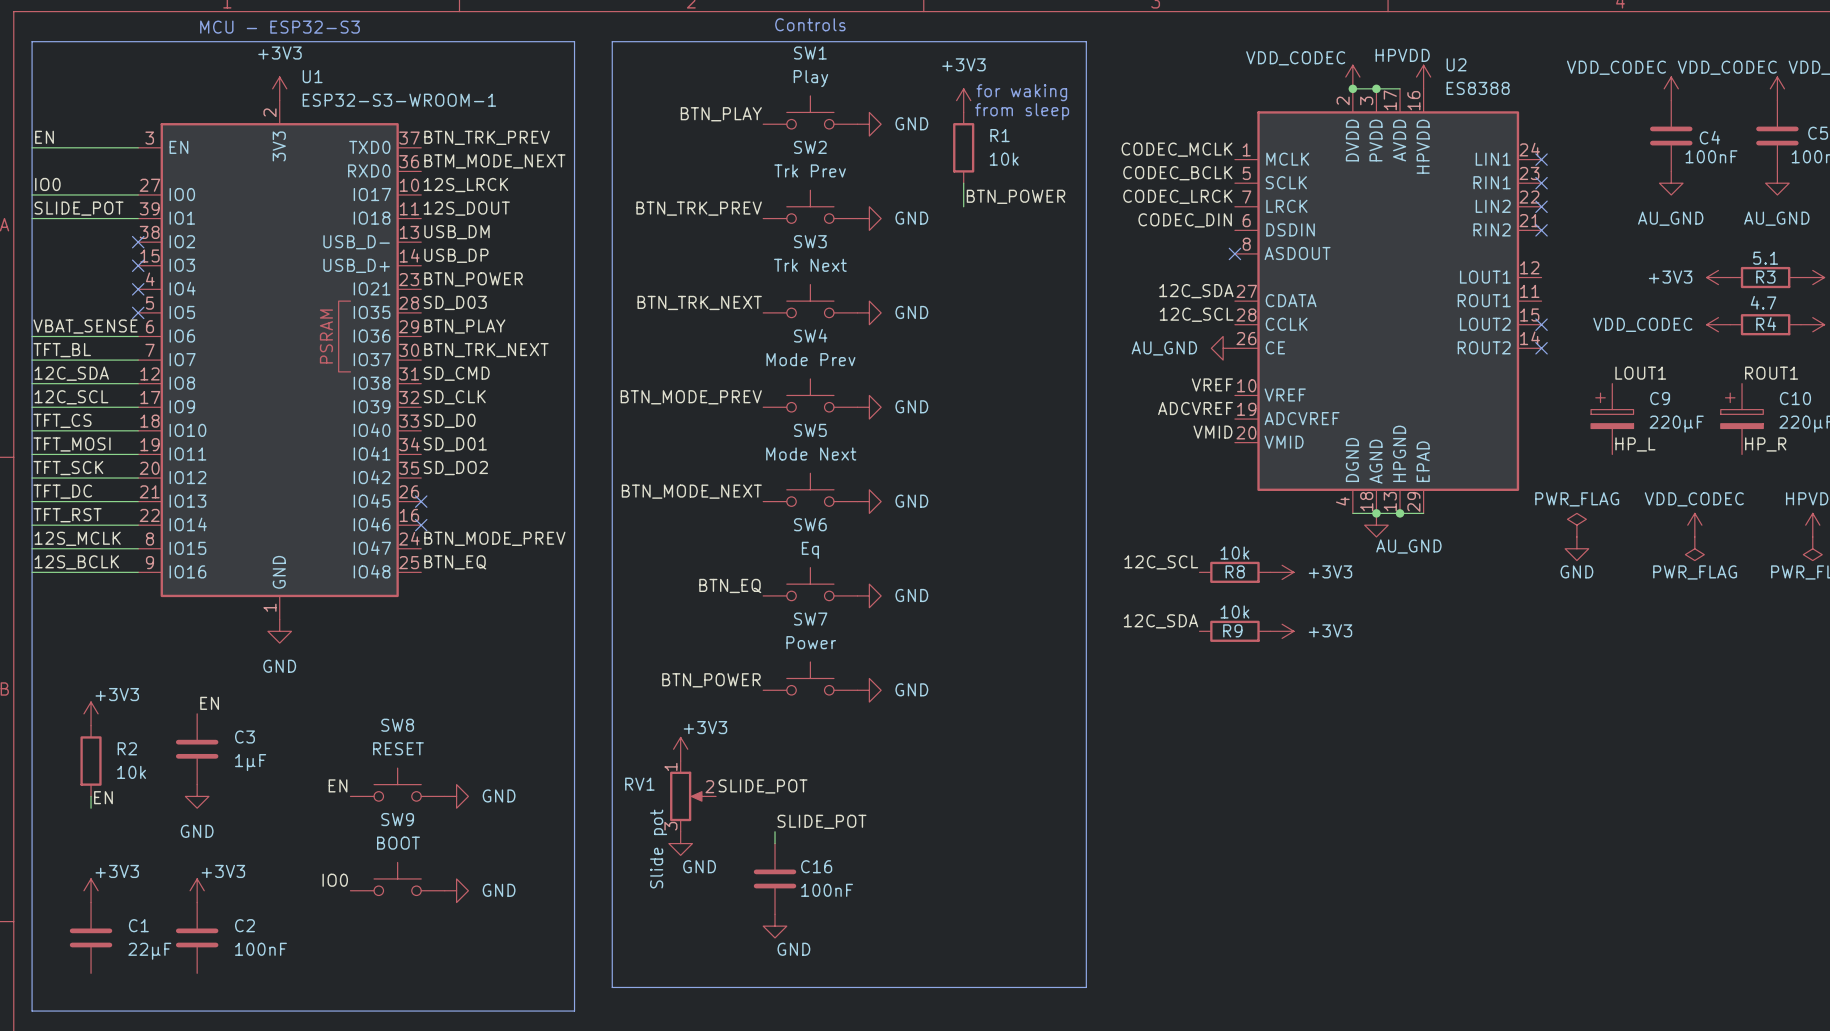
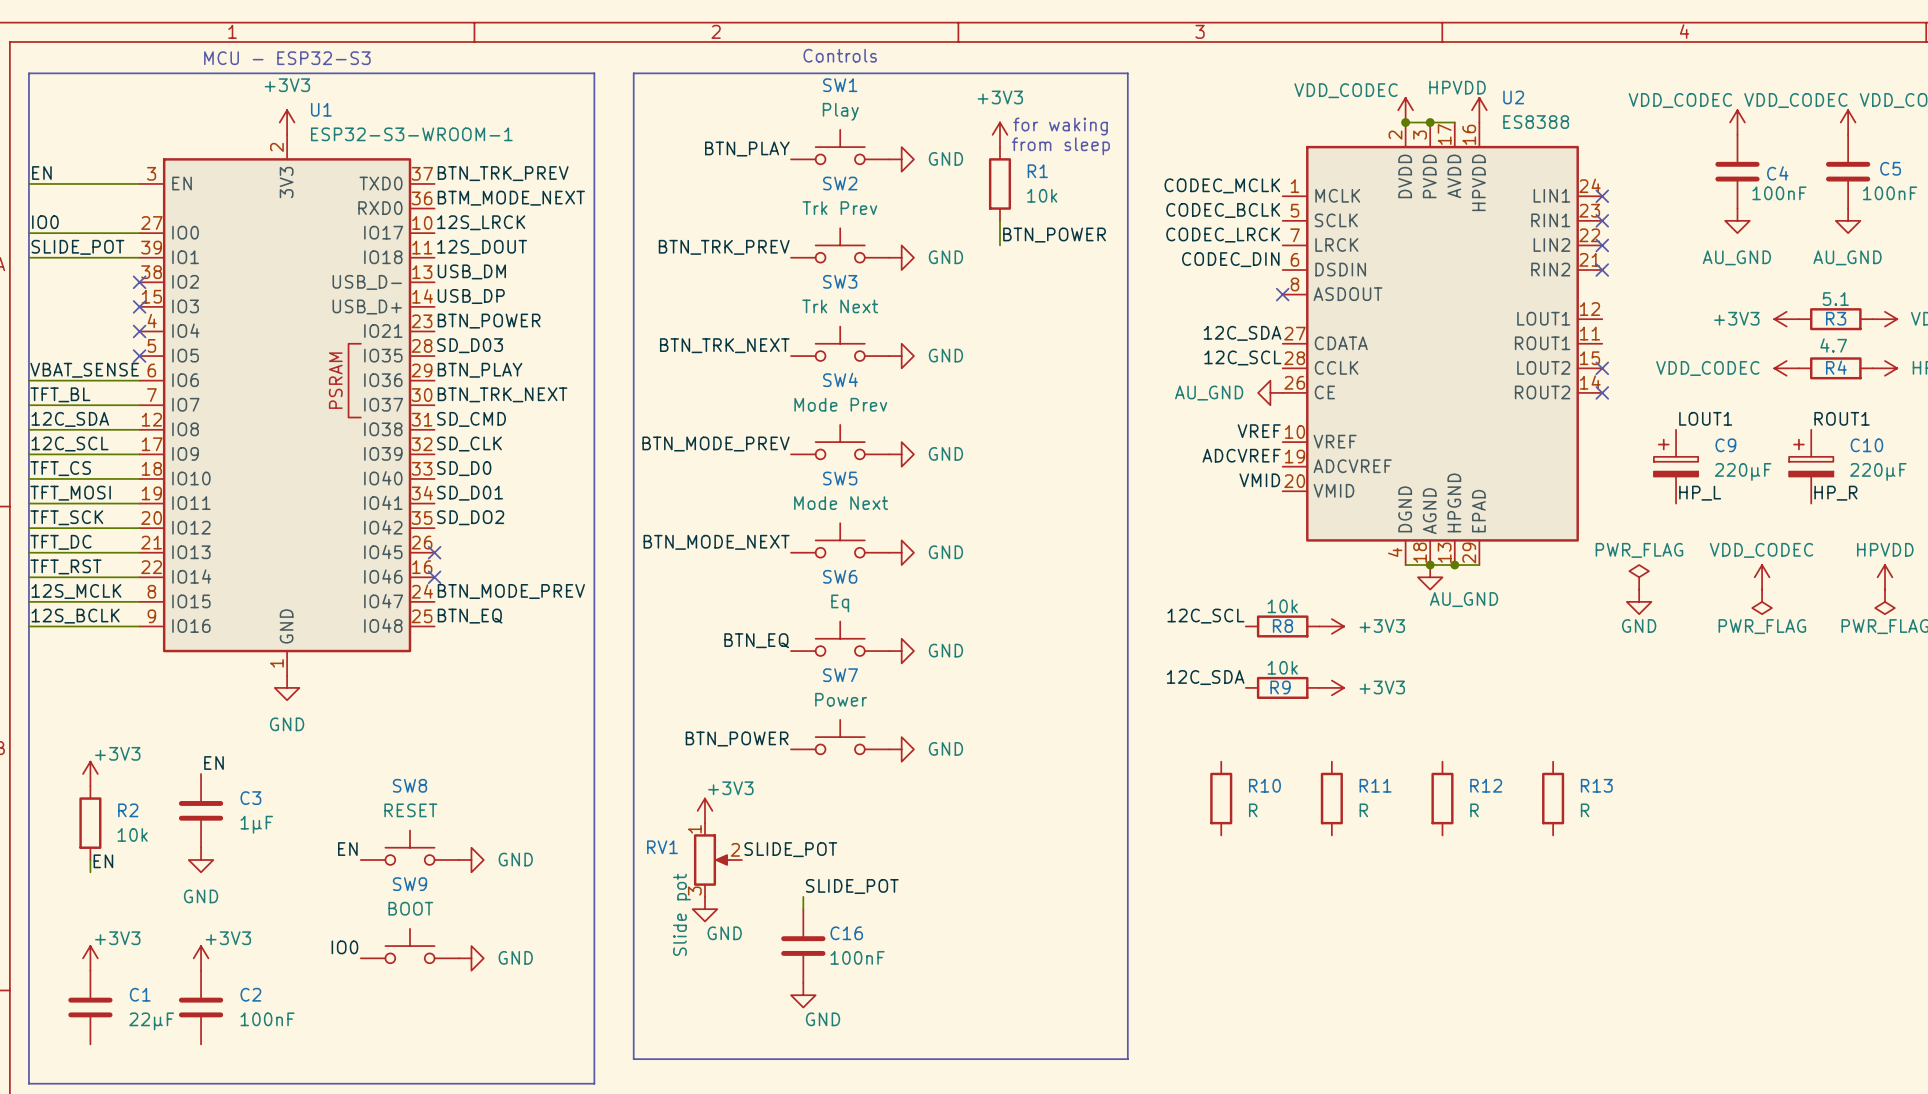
R10: none -> R (1221, 798)
R11: none -> R (1331, 798)
R12: none -> R (1442, 798)
R13: none -> R (1553, 798)

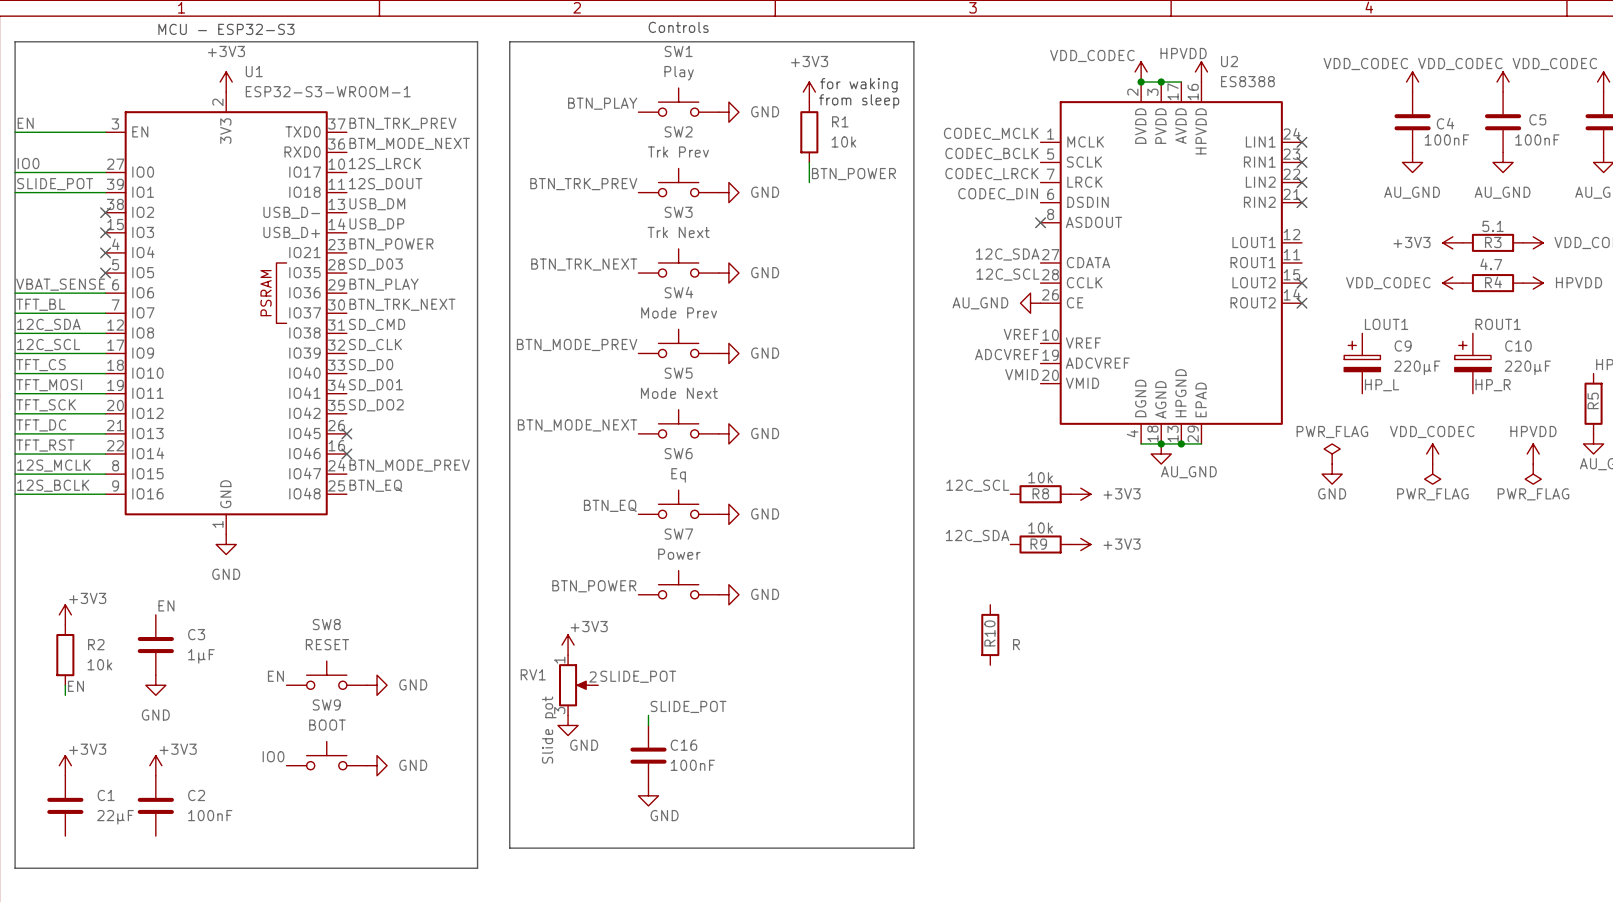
R10 name rotation: 0° (1264, 785) -> 90° counterclockwise (989, 633)
R10 name position: R10 (1264, 785) -> R10 (989, 633)
R11: R (1331, 798) -> none
R12: R (1442, 798) -> none
R13: R (1553, 798) -> none

